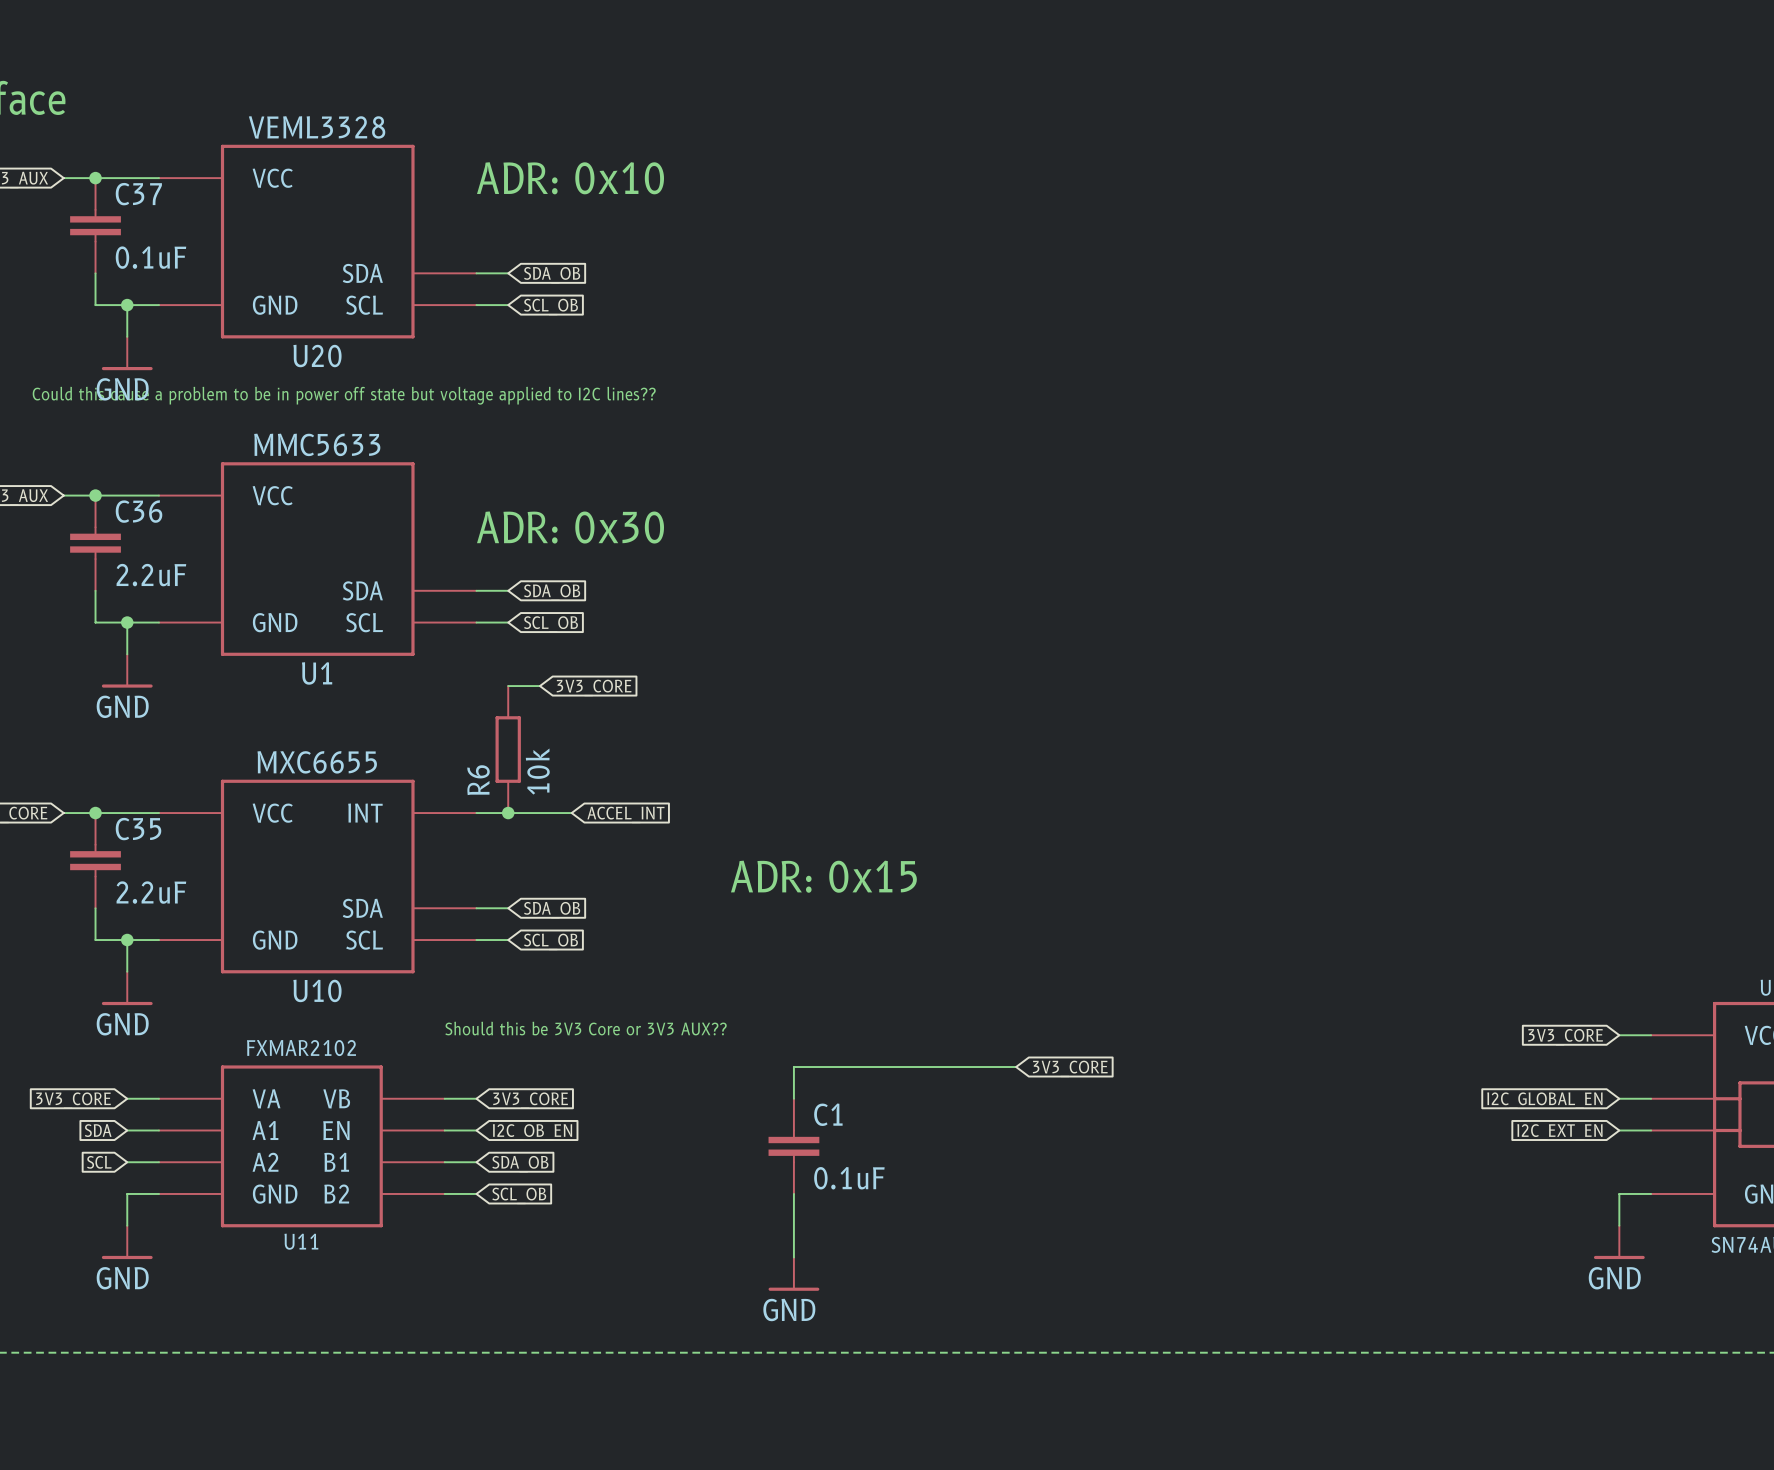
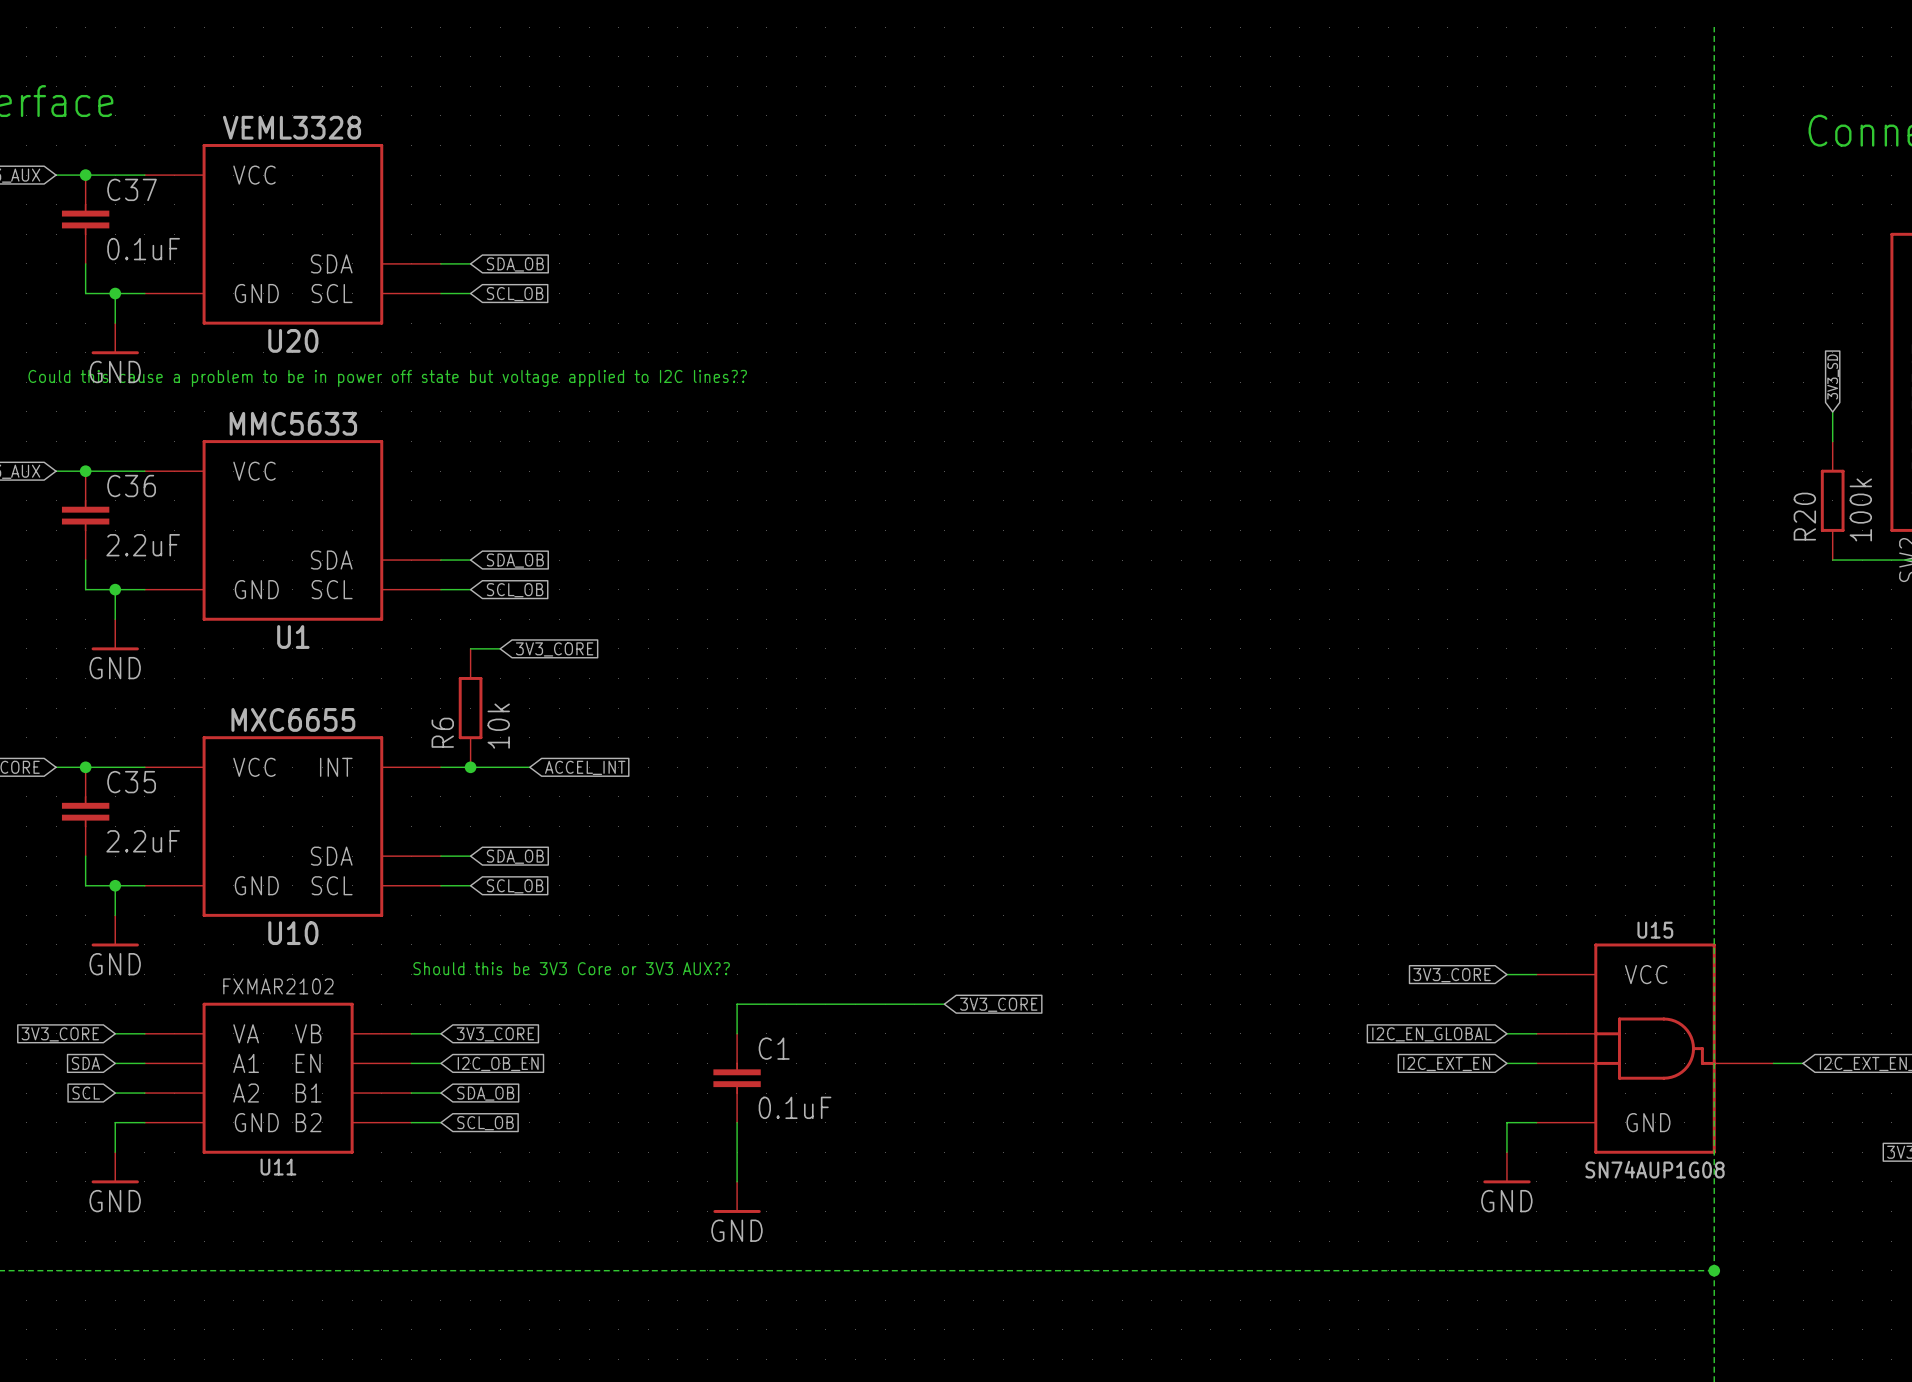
text: ADR: 0x10 (570, 178) -> none
text: ADR: 0x30 (570, 527) -> none
text: ADR: 0x15 (823, 876) -> none
global label: I2C_GLOBAL_EN (1544, 1100) -> I2C_EN_GLOBAL (1431, 1034)

